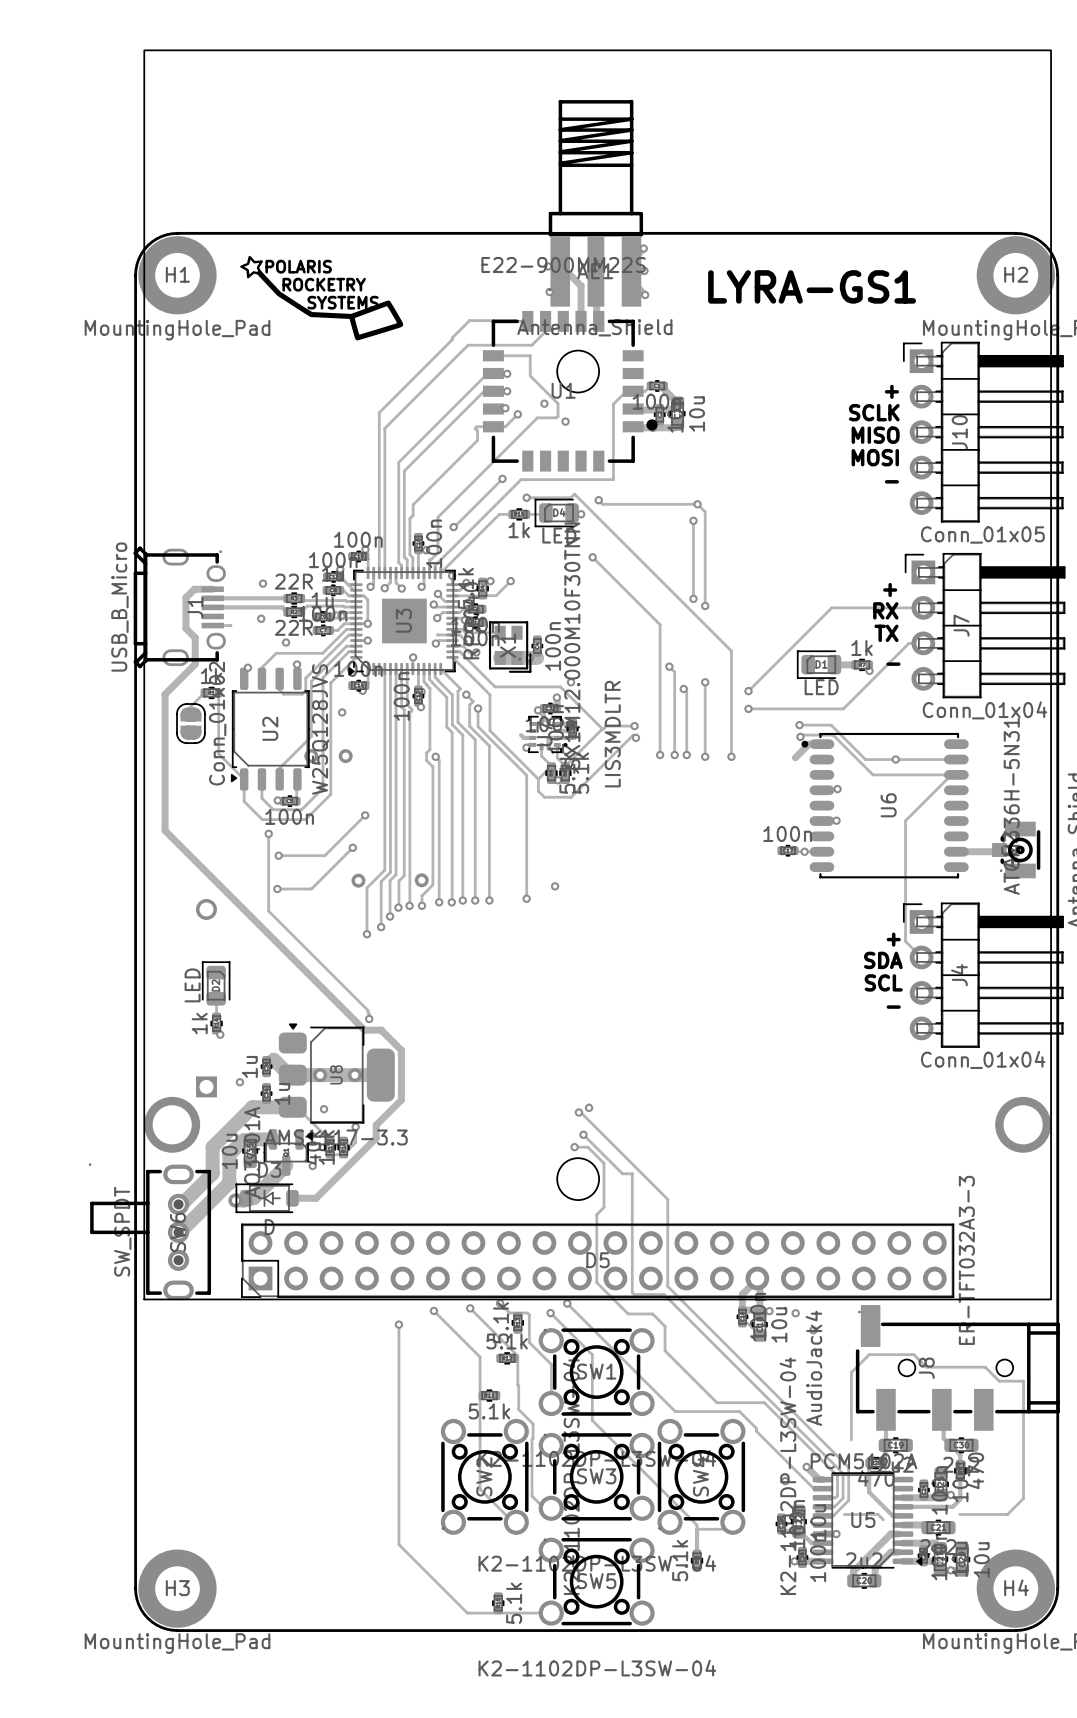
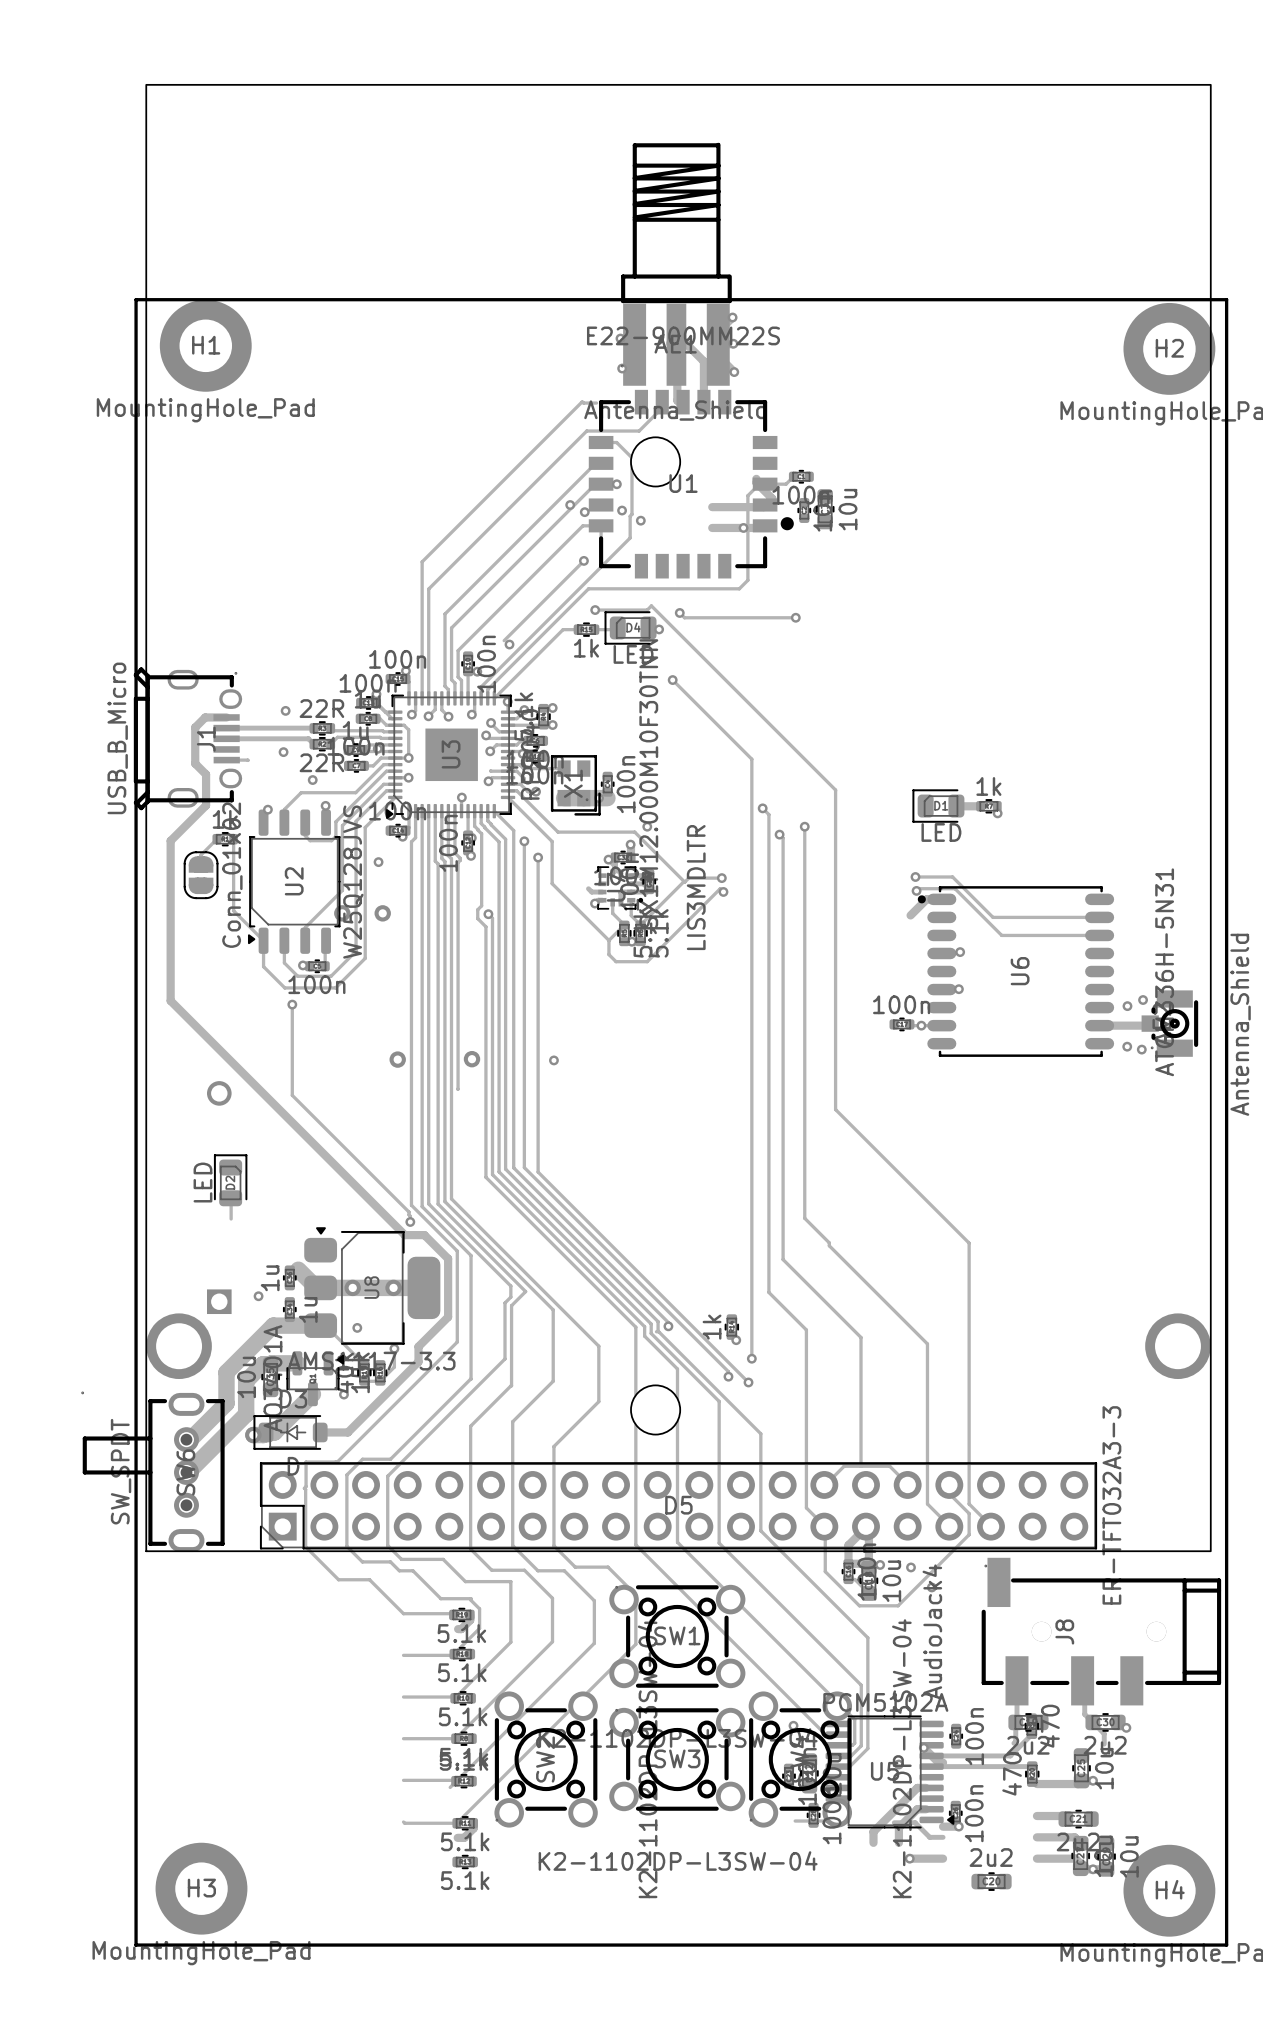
board edge: (177, 233) (161, 236) (147, 245) (138, 259) (135, 275) -> (185, 299) (136, 299) (136, 348)
board edge: (1015, 233) (1031, 236) (1045, 245) (1054, 259) (1057, 275) (1057, 1588) (1052, 1609) (1036, 1624) (1015, 1630) (177, 1630) (161, 1627) (147, 1618) (138, 1604) (135, 1588) -> (1169, 299) (1226, 299) (1226, 1945) (136, 1945) (136, 1890)
drawing: [240, 255, 404, 341] -> none
text: POLARIS (298, 266) -> none
track: (561, 266) (581, 285) (581, 321) -> none
track: none -> (670, 343) (685, 343) (703, 361) (703, 402)
H1 position: (177, 275) -> (205, 345)
text: ROCKETRY (324, 284) -> none
text: LYRA-GS1 (812, 286) -> none
text: SYSTEMS (343, 302) -> none
track: (515, 320) (469, 320) (452, 338) (379, 412) (379, 456) -> (581, 402) (422, 561)
track: (546, 320) (546, 330) (531, 345) -> (662, 402) (662, 407) (639, 431) (601, 431)
track: (519, 345) (468, 345) (384, 428) (384, 479) -> (586, 431) (428, 589)
track: (493, 355) (530, 355) (530, 375) (558, 403) -> (601, 442) (616, 442) (631, 457) (631, 499)
track: (493, 373) (487, 373) (398, 462) (398, 501) -> (601, 463) (595, 463) (445, 614)
via: (507, 373) -> none
track: (650, 385) (645, 391) (626, 391) (613, 404) (613, 479) -> (793, 476) (786, 484) (759, 484) (747, 495) (747, 580) (739, 588) (697, 588)
part position: (657, 385) -> (801, 476)
track: (484, 390) (404, 471) (404, 512) -> (601, 484) (595, 484) (451, 627)
via: none -> (616, 484)
via: (507, 391) -> none
U1 position: (570, 391) -> (691, 484)
text: + (891, 391) -> none
via: (544, 403) -> none
via: none -> (622, 510)
text: SCLK (874, 412) -> none
part position: (677, 413) -> (825, 509)
track: (517, 414) (505, 426) (477, 426) (475, 428) (477, 430) (477, 440) (413, 504) (413, 515) (409, 518) (409, 532) -> (601, 542) (601, 525) (582, 525) (458, 650)
part position: (659, 414) -> (804, 510)
track: (556, 417) (537, 417) (437, 517) (437, 552) (429, 559) (429, 563) -> (630, 516) (630, 537) (481, 686)
J10: Conn_01x05 (983, 432) -> none
text: MISO (875, 435) -> none
track: none -> (583, 560) (504, 640)
text: MOSI (875, 457) -> none
track: (502, 478) (453, 527) -> none
via position: (502, 478) -> (583, 560)
text: - (891, 481) -> none
track: (697, 504) (705, 511) (705, 605) -> none
track: (693, 520) (693, 598) -> none
via: (693, 520) -> none
track: (510, 581) (496, 595) (490, 595) -> none
via position: (510, 581) -> (552, 725)
text: + (890, 590) -> none
via: (693, 598) -> none
via: (705, 605) -> none
track: (923, 607) (831, 607) (748, 691) -> none
text: RX (885, 610) -> none
J7: Conn_01x04 (985, 625) -> none
text: TX (886, 633) -> none
track: (923, 643) (908, 643) (843, 708) (748, 708) -> none
text: _ (893, 664) -> none
track: none -> (415, 811) (415, 837) (411, 841) (411, 1205) (457, 1251) (457, 1342) (336, 1462) (306, 1462) (306, 1486) (304, 1488) (305, 1546) (338, 1579) (369, 1579) (403, 1613) (453, 1614)
track: none -> (422, 811) (422, 1206) (471, 1255) (471, 1379) (390, 1459) (362, 1459) (346, 1474) (346, 1546) (362, 1561) (390, 1561) (399, 1570) (412, 1570) (440, 1598) (471, 1598) (479, 1608) (479, 1628) (452, 1655) (403, 1655)
track: (457, 685) (460, 688) (457, 691) (457, 722) (475, 739) (475, 900) -> (513, 830) (513, 1167) (668, 1322)
via: (748, 691) -> none
track: (450, 692) (452, 694) (452, 724) (462, 735) (462, 900) -> (505, 839) (505, 1169) (658, 1321) (658, 1331)
track: (466, 694) (473, 701) (469, 705) (469, 726) (489, 745) (489, 900) -> (524, 841) (524, 1167) (728, 1371) (728, 1376)
track: (444, 695) (446, 697) (446, 727) (452, 732) (451, 902) -> (499, 841) (499, 1171) (651, 1324) (651, 1333) (719, 1401) (719, 1403)
via: (748, 708) -> none
track: (396, 709) (396, 874) (390, 880) (390, 916) -> (441, 858) (444, 861) (444, 1201) (553, 1309) (553, 1381) (512, 1421) (512, 1545) (528, 1561)
track: (390, 711) (390, 872) (381, 881) (381, 927) -> (435, 861) (438, 864) (438, 1204) (525, 1291) (511, 1305) (511, 1385) (470, 1426) (470, 1549) (486, 1564)
track: (478, 726) (526, 775) (526, 898) -> (538, 878) (538, 1172) (748, 1382)
track: none -> (751, 912) (751, 1358)
via: (660, 755) -> none
track: none -> (768, 912) (768, 1292) (806, 1329) (806, 1507) (825, 1526) (825, 1571) (859, 1605) (898, 1605) (969, 1534) (969, 1513) (950, 1494) (950, 1485)
via: (674, 755) -> none
track: none -> (783, 912) (783, 1259) (861, 1337) (861, 1466)
via: (686, 755) -> none
track: none -> (804, 914) (804, 1218) (829, 1242) (829, 1245) (927, 1343) (927, 1503) (950, 1526)
via: (705, 756) -> none
track: none -> (835, 914) (835, 1109) (969, 1243) (969, 1503) (991, 1526)
via: (731, 756) -> none
via: (895, 759) -> none
track: (432, 766) (432, 884) (421, 895) (421, 905) -> (485, 925) (485, 1177) (635, 1327) (635, 1544) (825, 1734) (837, 1734)
track: (951, 774) (905, 820) (905, 941) (921, 957) -> none
track: (365, 815) (324, 855) (278, 855) -> none
via: (365, 815) -> none
via: none -> (1143, 1000)
via: none -> (1127, 1006)
track: (352, 847) (311, 889) (277, 889) -> none
via: (352, 847) -> none
via: (278, 855) -> none
via: none -> (1127, 1046)
track: (384, 870) (366, 887) (366, 934) -> (428, 1047) (428, 1203) (510, 1286) (510, 1297) (505, 1302) (505, 1358) (387, 1476) (387, 1545) (401, 1559) (443, 1559) (465, 1581) (510, 1581) (510, 1642) (454, 1698) (403, 1697)
via: none -> (1141, 1049)
track: (404, 875) (398, 881) (398, 907) -> (451, 1053) (451, 1198) (598, 1346) (598, 1401) (553, 1446) (553, 1545) (563, 1555)
via: none -> (553, 1060)
via: (555, 886) -> none
via: (277, 889) -> none
via: (526, 898) -> none
via: (462, 900) -> none
via: (475, 900) -> none
via: (489, 900) -> none
via: (439, 902) -> none
via: (451, 902) -> none
via: (409, 905) -> none
via: (421, 905) -> none
via: (398, 907) -> none
via: (390, 916) -> none
via: (381, 927) -> none
via: (366, 934) -> none
text: + (893, 939) -> none
text: SDA (883, 960) -> none
J4: Conn_01x04 (983, 975) -> none
text: SCL (883, 982) -> none
text: - (893, 1007) -> none
part position: (216, 1023) -> (731, 1327)
via: (220, 1034) -> none
via: (578, 1112) -> none
via: none -> (736, 1340)
track: (583, 1134) (622, 1173) (632, 1173) -> none
via: (583, 1134) -> none
via: none -> (751, 1358)
track: (574, 1147) (587, 1147) (603, 1163) (603, 1207) (596, 1214) -> (492, 1085) (492, 1174) (644, 1326) (644, 1336) (677, 1369) (677, 1451)
via: (574, 1147) -> none
via: none -> (728, 1376)
via: none -> (748, 1382)
track: none -> (825, 1485) (844, 1466) (889, 1466) (908, 1485)
track: (596, 1282) (628, 1313) (652, 1313) (665, 1326) (665, 1350) (716, 1402) (764, 1402) (837, 1475) (837, 1495) (835, 1497) (822, 1497) -> (677, 1531) (677, 1542) (854, 1719) (854, 1743) (852, 1745) (837, 1745)
track: (667, 1282) (667, 1286) (848, 1467) (848, 1500) (833, 1515) (822, 1515) -> (760, 1530) (867, 1637) (867, 1748) (849, 1766) (837, 1766)
track: (634, 1294) (664, 1294) (843, 1473) (843, 1498) (834, 1506) (822, 1506) -> (721, 1545) (861, 1685) (861, 1745) (851, 1755) (837, 1755)
via: (500, 1303) -> none
track: (567, 1303) (675, 1411) (739, 1411) (756, 1428) (756, 1431) (813, 1488) (822, 1488) -> none
via: (567, 1303) -> none
J8 footprint: [855, 1305, 1060, 1431] -> [981, 1557, 1222, 1706]
via: (470, 1308) -> none
via: (433, 1310) -> none
track: (527, 1312) (529, 1314) (529, 1342) (551, 1364) (551, 1403) -> (596, 1567) (608, 1567) (635, 1594) (635, 1644) (456, 1823) (403, 1822)
track: (550, 1313) (592, 1354) (592, 1420) (697, 1525) (697, 1553) -> none
via: (550, 1313) -> none
track: (438, 1315) (480, 1357) (480, 1489) (516, 1525) (516, 1529) -> (491, 1570) (524, 1570) (552, 1598) (552, 1641) (455, 1738) (403, 1738)
track: (477, 1316) (517, 1356) (518, 1409) (533, 1424) (532, 1496) (551, 1515) -> (537, 1570) (564, 1570) (594, 1600) (594, 1643) (450, 1787)
part rotation: 0° (517, 1322) -> 90° clockwise (465, 1862)
part position: (517, 1322) -> (465, 1862)
track: (398, 1324) (398, 1544) (467, 1613) (551, 1613) -> none
via: (398, 1324) -> none
part: none -> 5.1k (461, 1614)
track: none -> (470, 1614) (470, 1620) (461, 1629) (458, 1629)
part position: (507, 1358) -> (463, 1781)
part: none -> 5.1k (462, 1654)
part position: (489, 1395) -> (465, 1823)
track: (851, 1439) (851, 1372) (869, 1354) (913, 1354) (926, 1367) (985, 1367) (999, 1381) (1023, 1381) (1023, 1498) (1007, 1514) (959, 1514) -> none
via: none -> (793, 1725)
via: none -> (1126, 1727)
track: none -> (1031, 1734) (1010, 1755) (931, 1755)
track: (869, 1463) (869, 1492) (892, 1515) (902, 1515) -> none
part rotation: 0° (876, 1463) -> 90° clockwise (1032, 1774)
part position: (876, 1463) -> (1032, 1774)
part position: (960, 1470) -> (1031, 1726)
track: (960, 1477) (960, 1499) (952, 1506) (902, 1506) -> none
track: none -> (1032, 1765) (931, 1766)
part position: (923, 1490) -> (956, 1736)
track: none -> (403, 1780) (455, 1781)
track: (844, 1514) (878, 1514) (883, 1519) -> none
U5 position: (867, 1520) -> (889, 1771)
part position: (798, 1521) -> (809, 1773)
part position: (781, 1524) -> (789, 1776)
track: none -> (473, 1823) (473, 1828) (464, 1837) (457, 1837)
track: (898, 1534) (890, 1534) (853, 1571) (853, 1580) -> (926, 1787) (917, 1787) (873, 1831) (873, 1842)
track: (898, 1552) (890, 1552) (875, 1567) (875, 1580) -> (926, 1809) (917, 1809) (898, 1827) (898, 1842)
part position: (923, 1555) -> (955, 1813)
part position: (802, 1557) -> (813, 1815)
part rotation: 0° (697, 1560) -> 90° clockwise (463, 1738)
part position: (697, 1560) -> (463, 1738)
SW5: K2-1102DP-L3SW-04 (596, 1581) -> none
H3 position: (177, 1588) -> (201, 1888)
part rotation: 0° (498, 1603) -> 90° clockwise (463, 1698)
part position: (498, 1603) -> (463, 1698)

